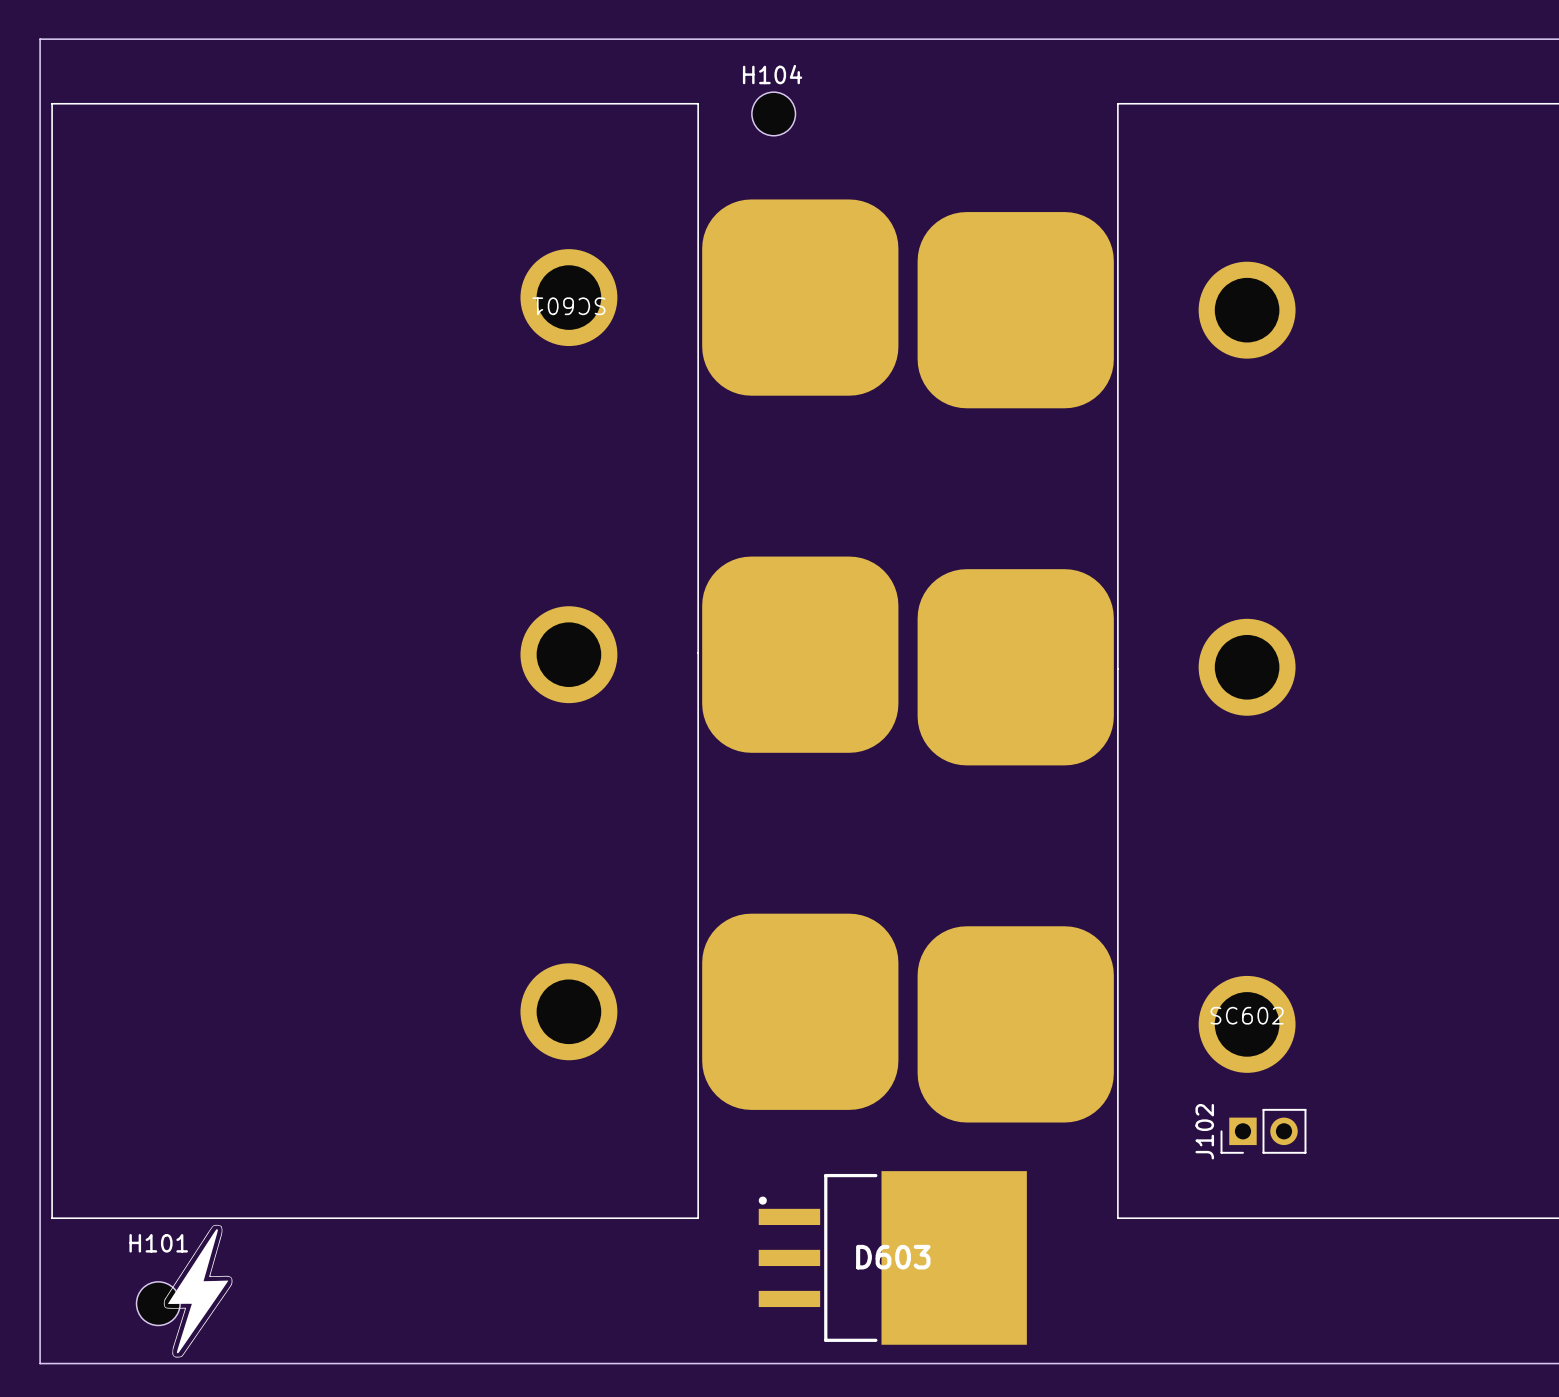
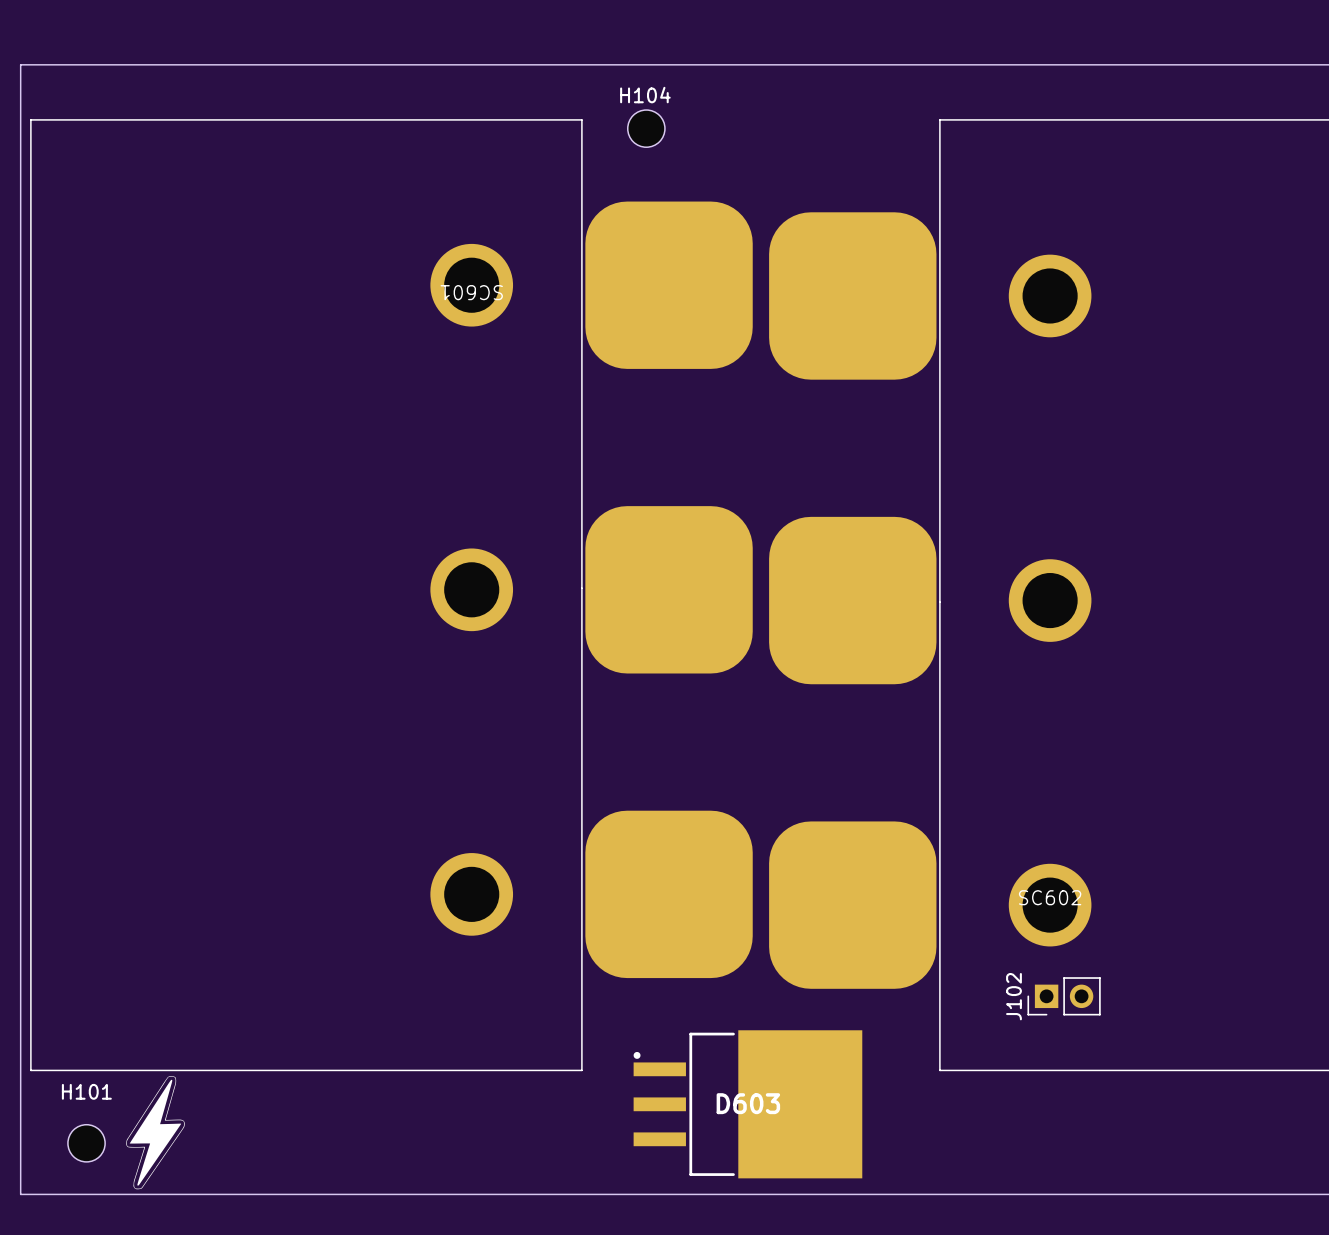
H101 position: (158, 1303) -> (86, 1143)

